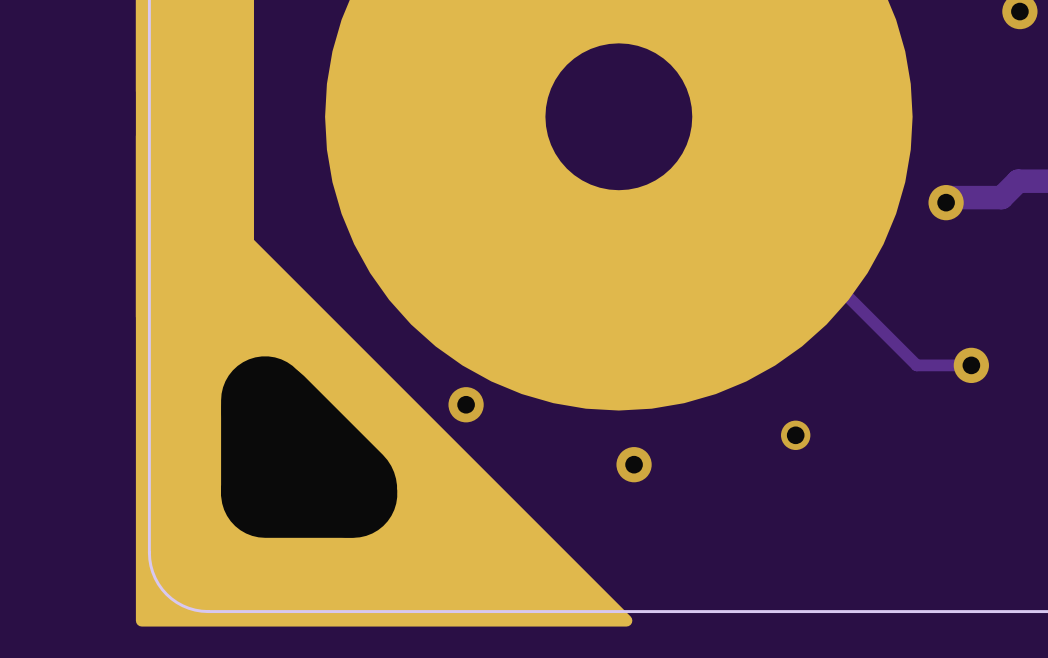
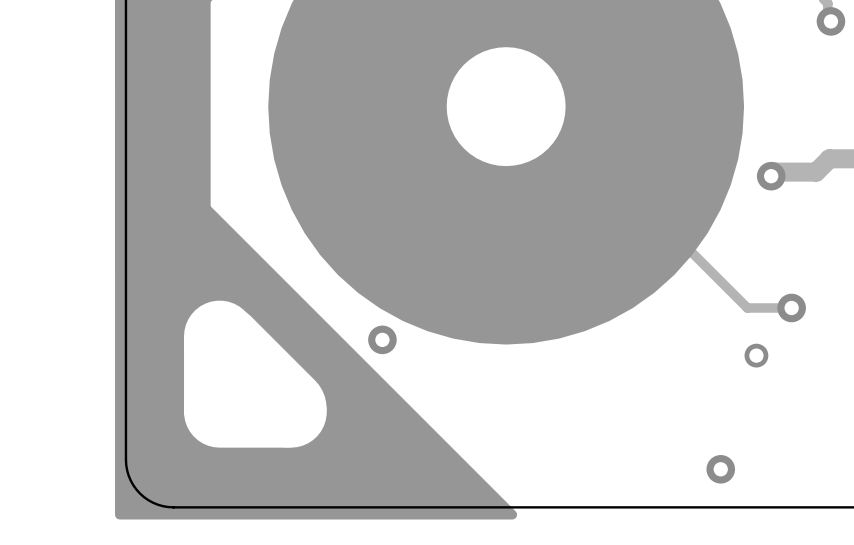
via position: (795, 435) -> (756, 355)
via position: (634, 464) -> (720, 469)

